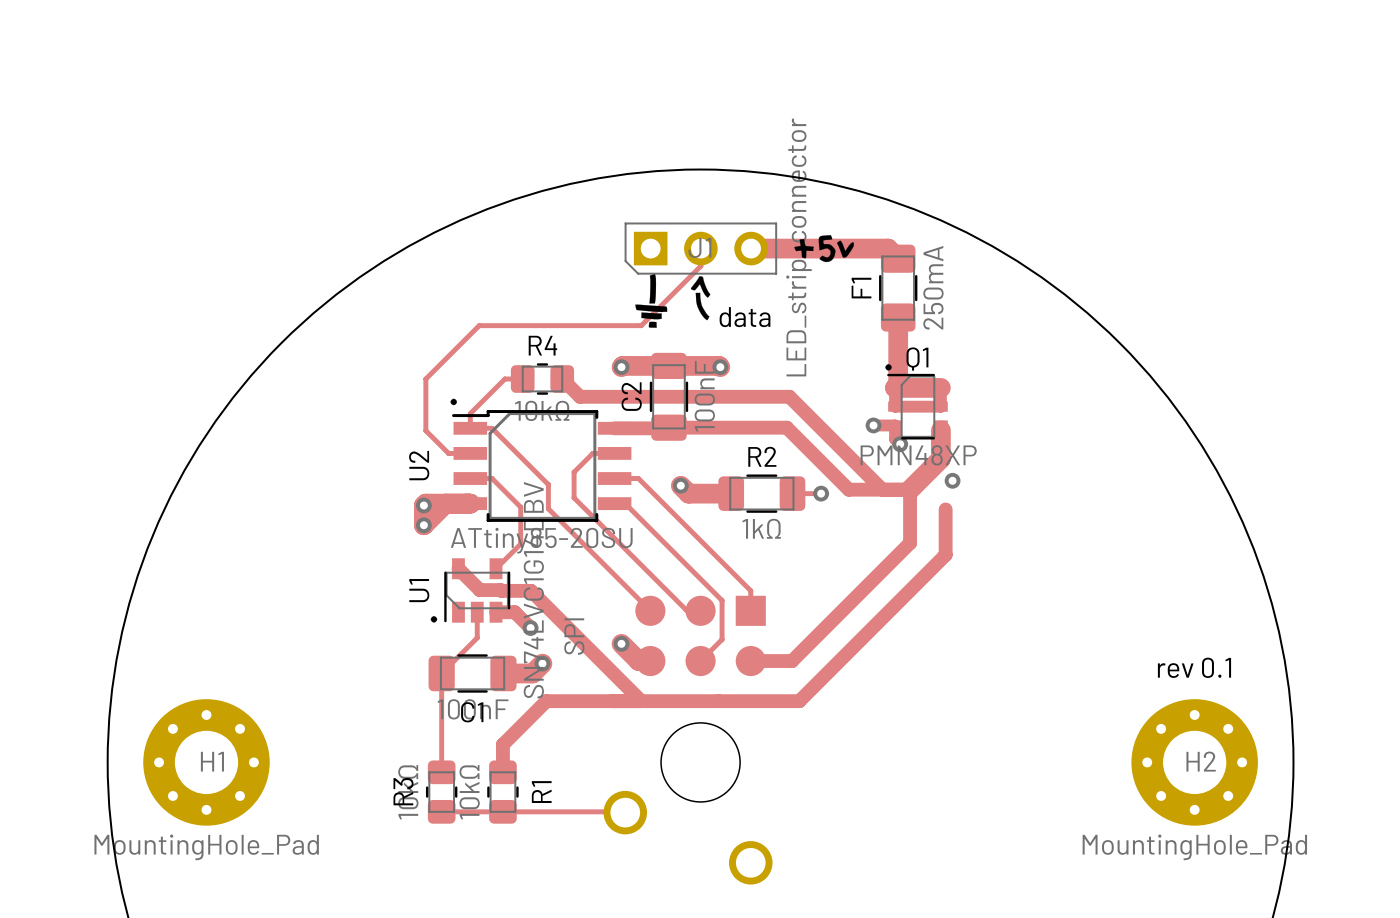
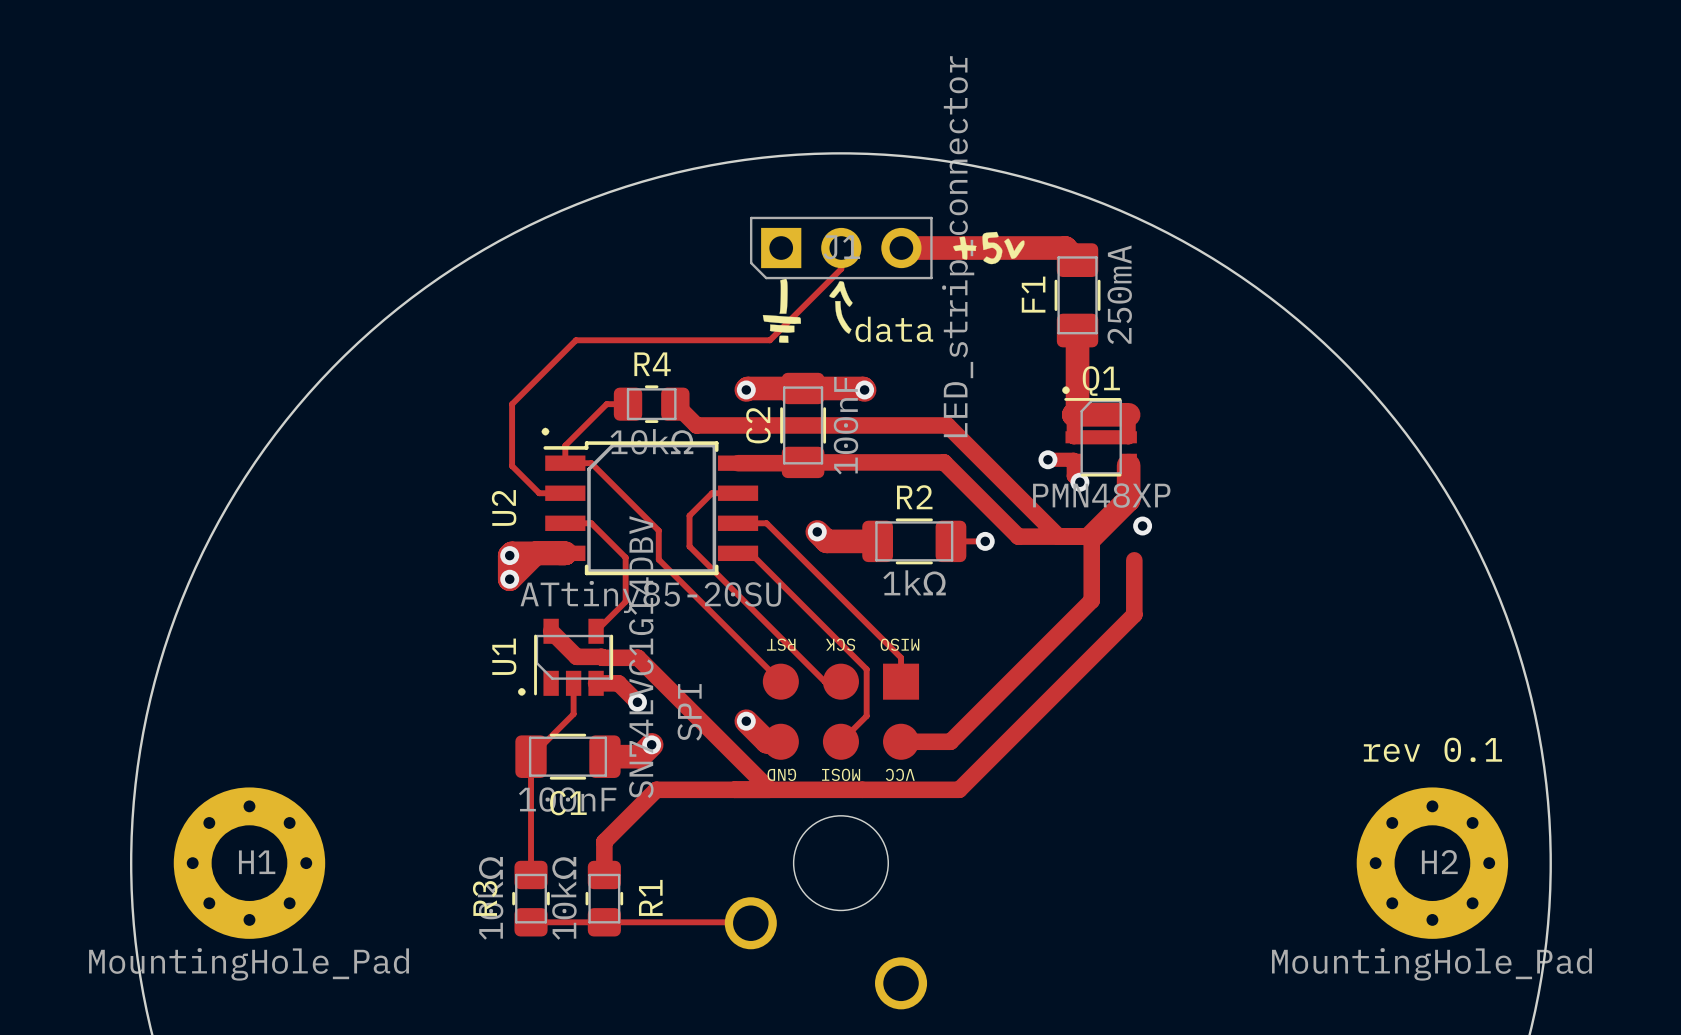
text: none -> RST (781, 644)
text: none -> SCK (840, 644)
text: none -> MISO (899, 644)
text: none -> GND (781, 774)
text: none -> MOSI (841, 774)
text: none -> VCC (900, 774)

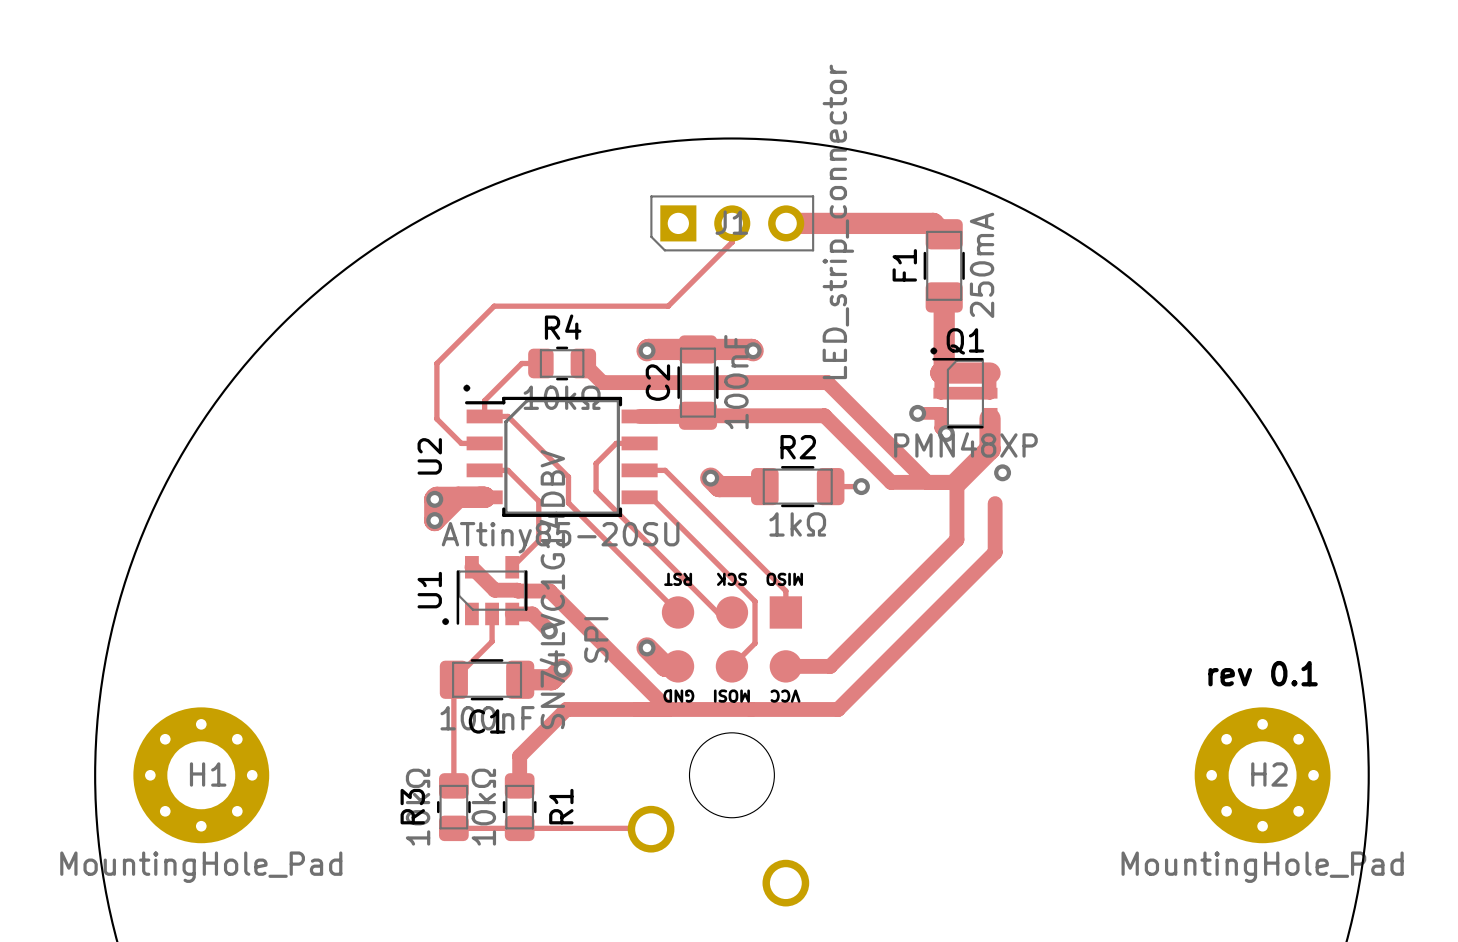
drawing: [953, 231, 1025, 265] -> none
drawing: [762, 278, 801, 343] -> none
drawing: [829, 281, 853, 334] -> none
text: data (894, 329) -> none

